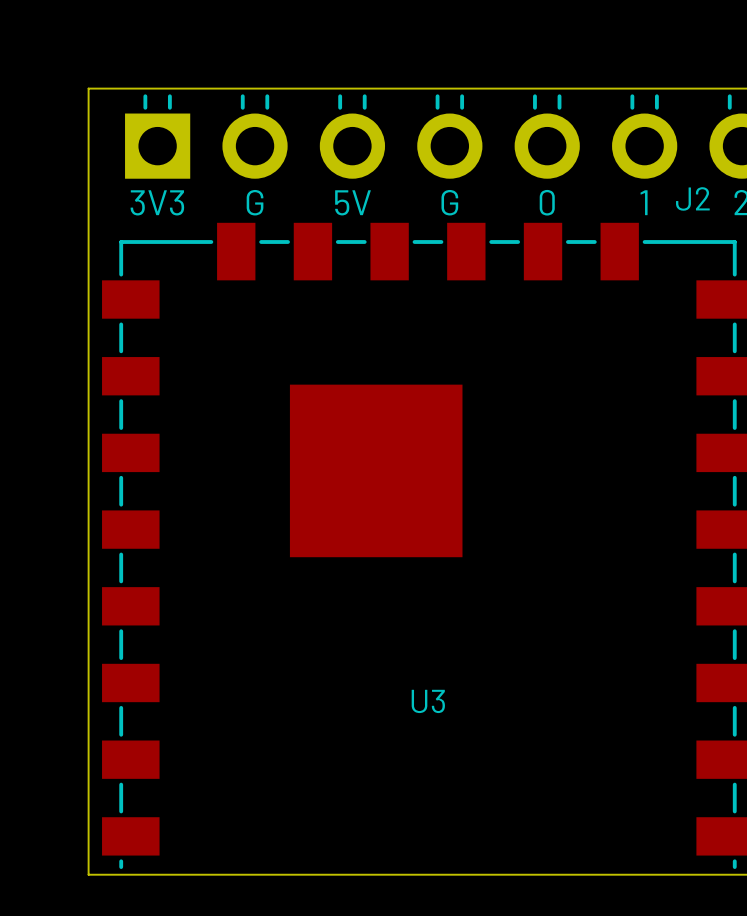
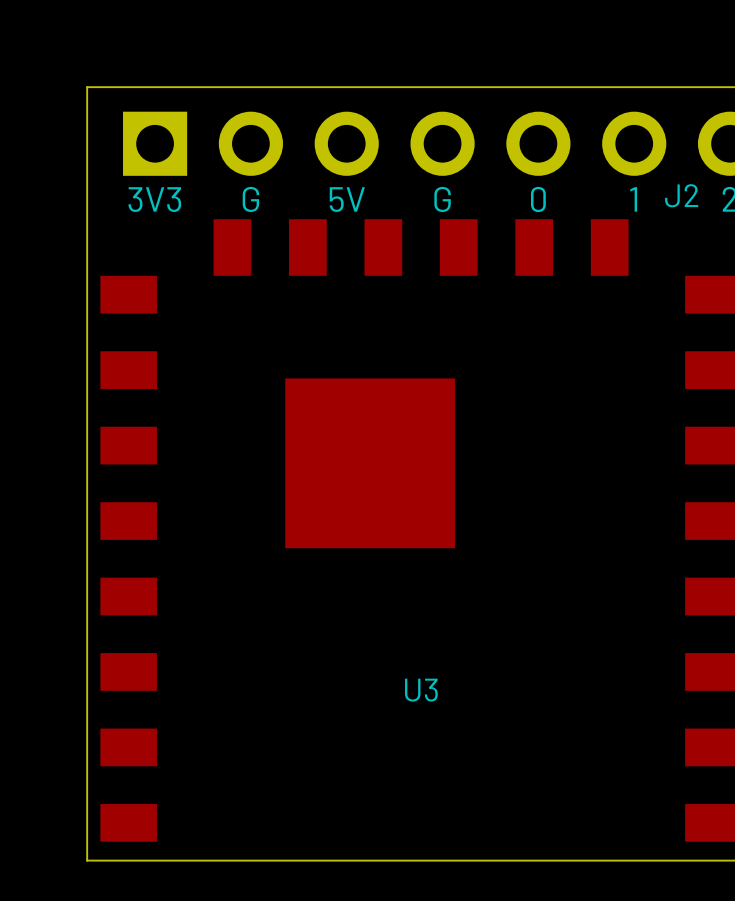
line: (145, 96) (145, 107) -> none
line: (169, 96) (169, 107) -> none
line: (242, 96) (242, 107) -> none
line: (267, 96) (267, 107) -> none
line: (340, 96) (340, 107) -> none
line: (364, 96) (364, 107) -> none
line: (437, 96) (437, 107) -> none
line: (462, 96) (462, 107) -> none
line: (534, 96) (534, 107) -> none
line: (559, 96) (559, 107) -> none
line: (632, 96) (632, 107) -> none
line: (656, 96) (656, 107) -> none
line: (729, 96) (729, 107) -> none
line: (211, 241) (121, 241) (121, 274) -> none
line: (261, 241) (288, 241) -> none
line: (337, 241) (364, 241) -> none
line: (414, 241) (441, 241) -> none
line: (491, 241) (518, 241) -> none
line: (567, 241) (594, 241) -> none
line: (644, 241) (734, 241) (734, 274) -> none
line: (121, 324) (121, 351) -> none
line: (734, 324) (734, 351) -> none
line: (121, 401) (121, 427) -> none
line: (734, 401) (734, 427) -> none
line: (121, 477) (121, 504) -> none
line: (734, 477) (734, 504) -> none
line: (121, 554) (121, 581) -> none
line: (734, 554) (734, 581) -> none
line: (121, 631) (121, 658) -> none
line: (734, 631) (734, 658) -> none
line: (121, 707) (121, 734) -> none
line: (734, 707) (734, 734) -> none
line: (121, 784) (121, 811) -> none
line: (734, 784) (734, 811) -> none
line: (121, 861) (121, 867) -> none
line: (734, 861) (734, 867) -> none

